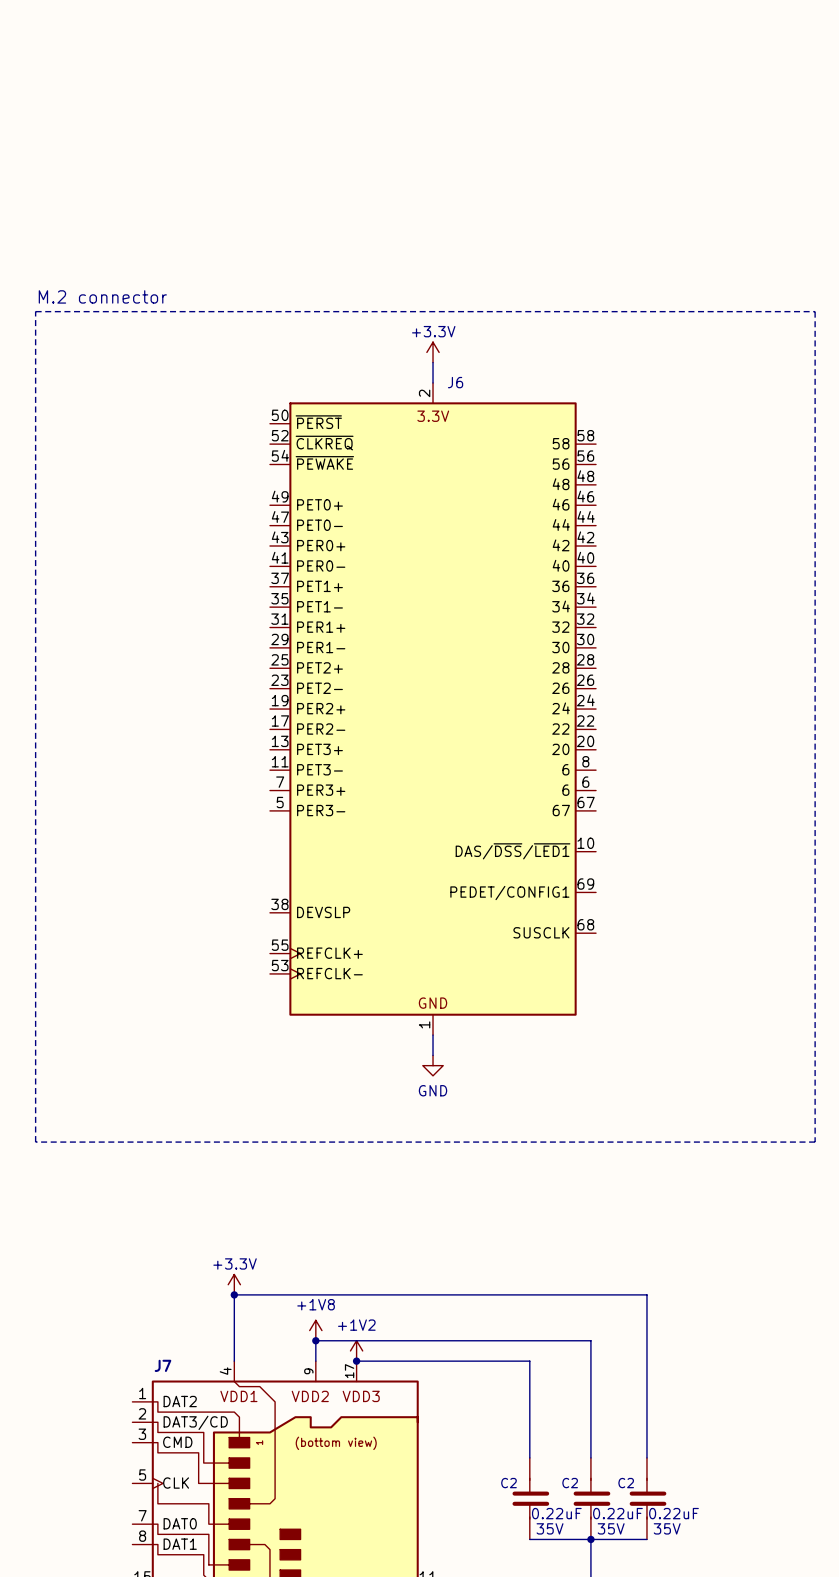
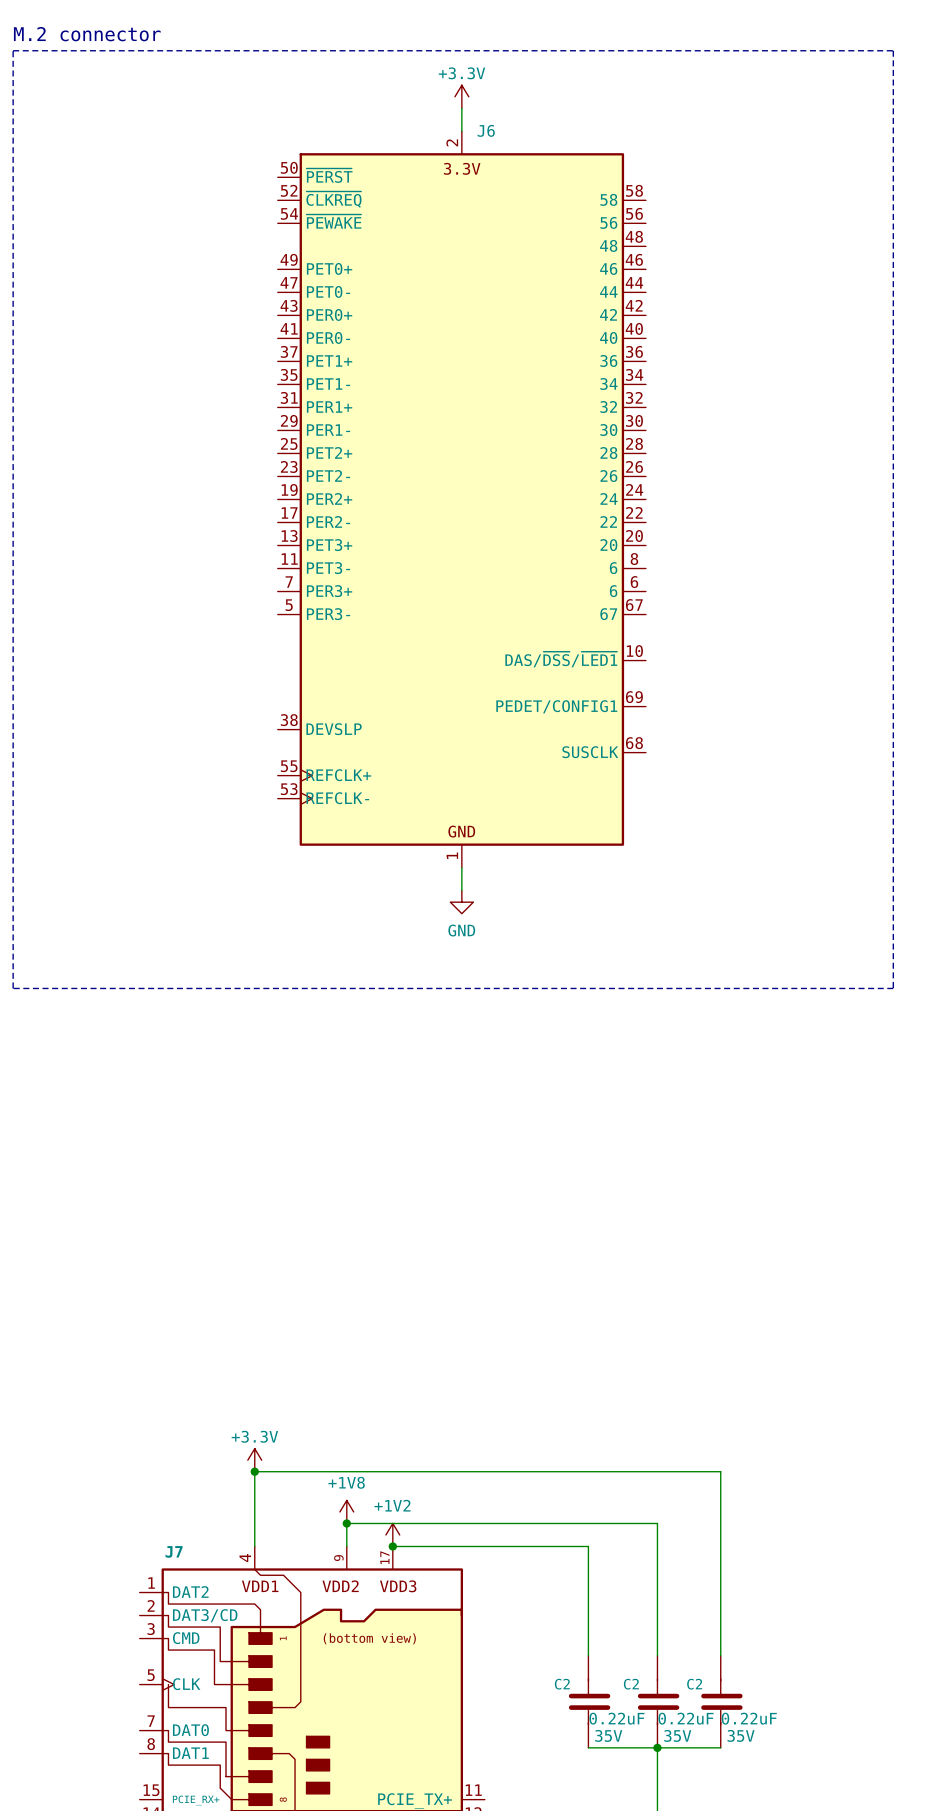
text: none -> M.2 connector (87, 34)
line: none -> (13, 50) (893, 50) (893, 988) (13, 988) (13, 50)
power symbol: none -> +3.3V (461, 96)
wire: none -> (461, 108) (461, 131)
text: M.2 connector (102, 296) -> none
line: (35, 311) (815, 311) (815, 1142) (35, 1142) (35, 311) -> none
power symbol: +3.3V (433, 352) -> none
J6 position: (433, 709) -> (461, 499)
power symbol: none -> GND (461, 902)
wire: (433, 1035) (433, 1055) -> none
power symbol: GND (433, 1065) -> none

